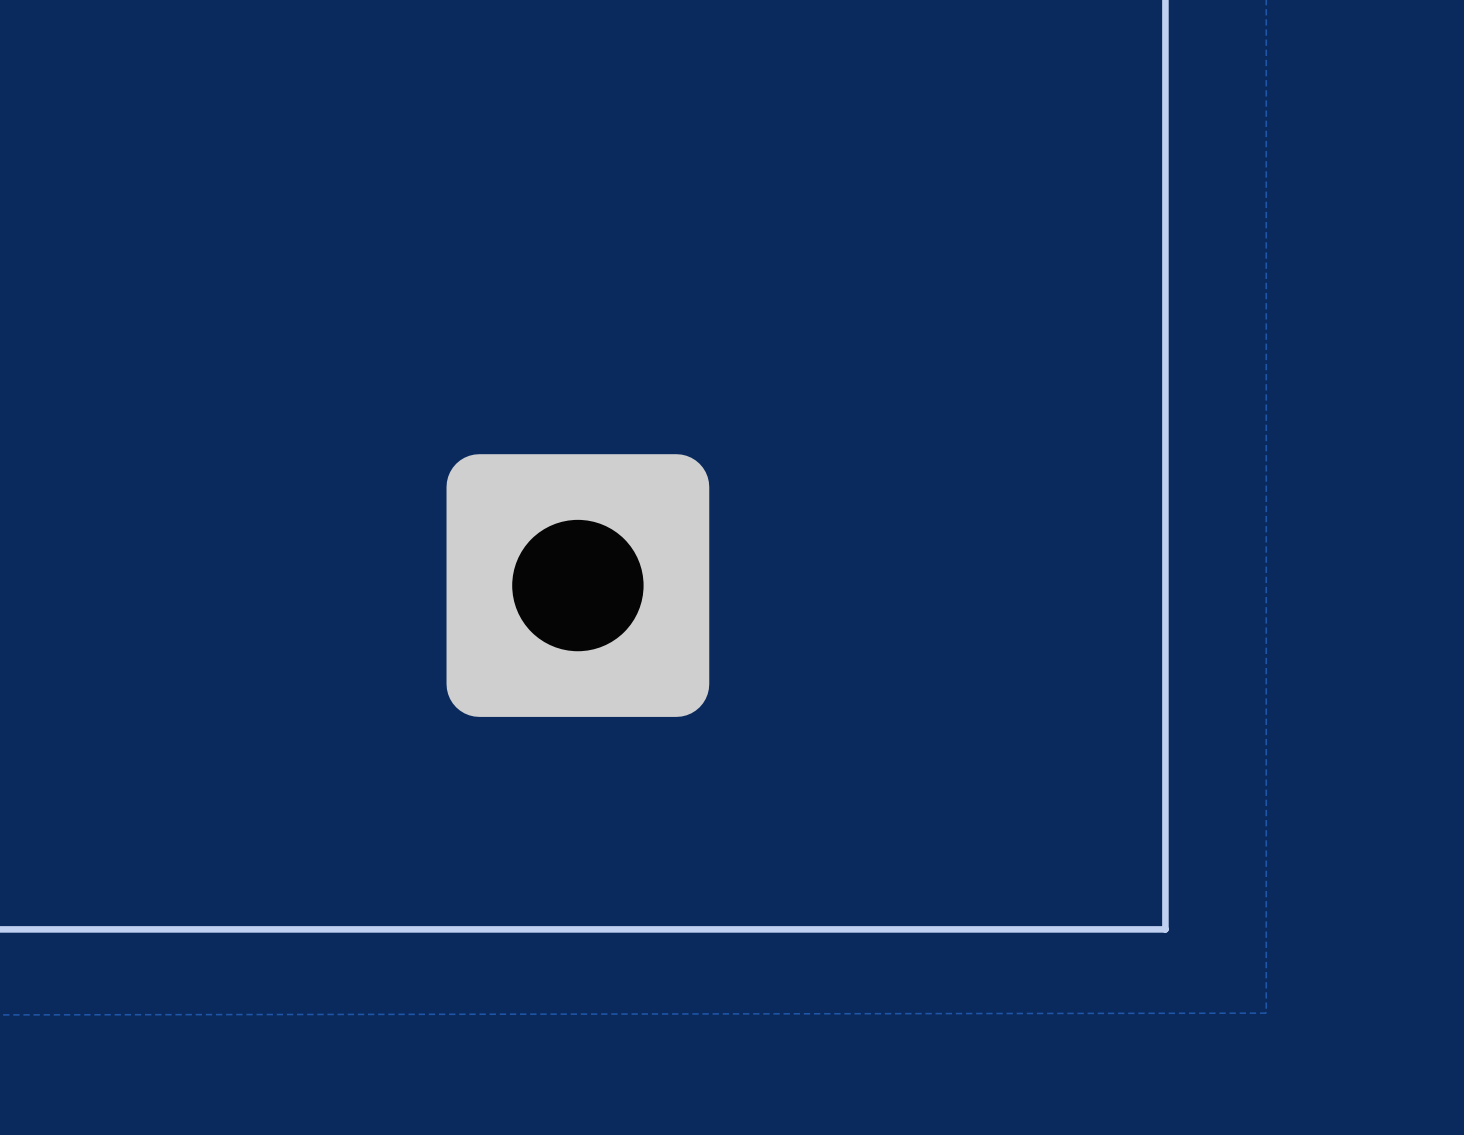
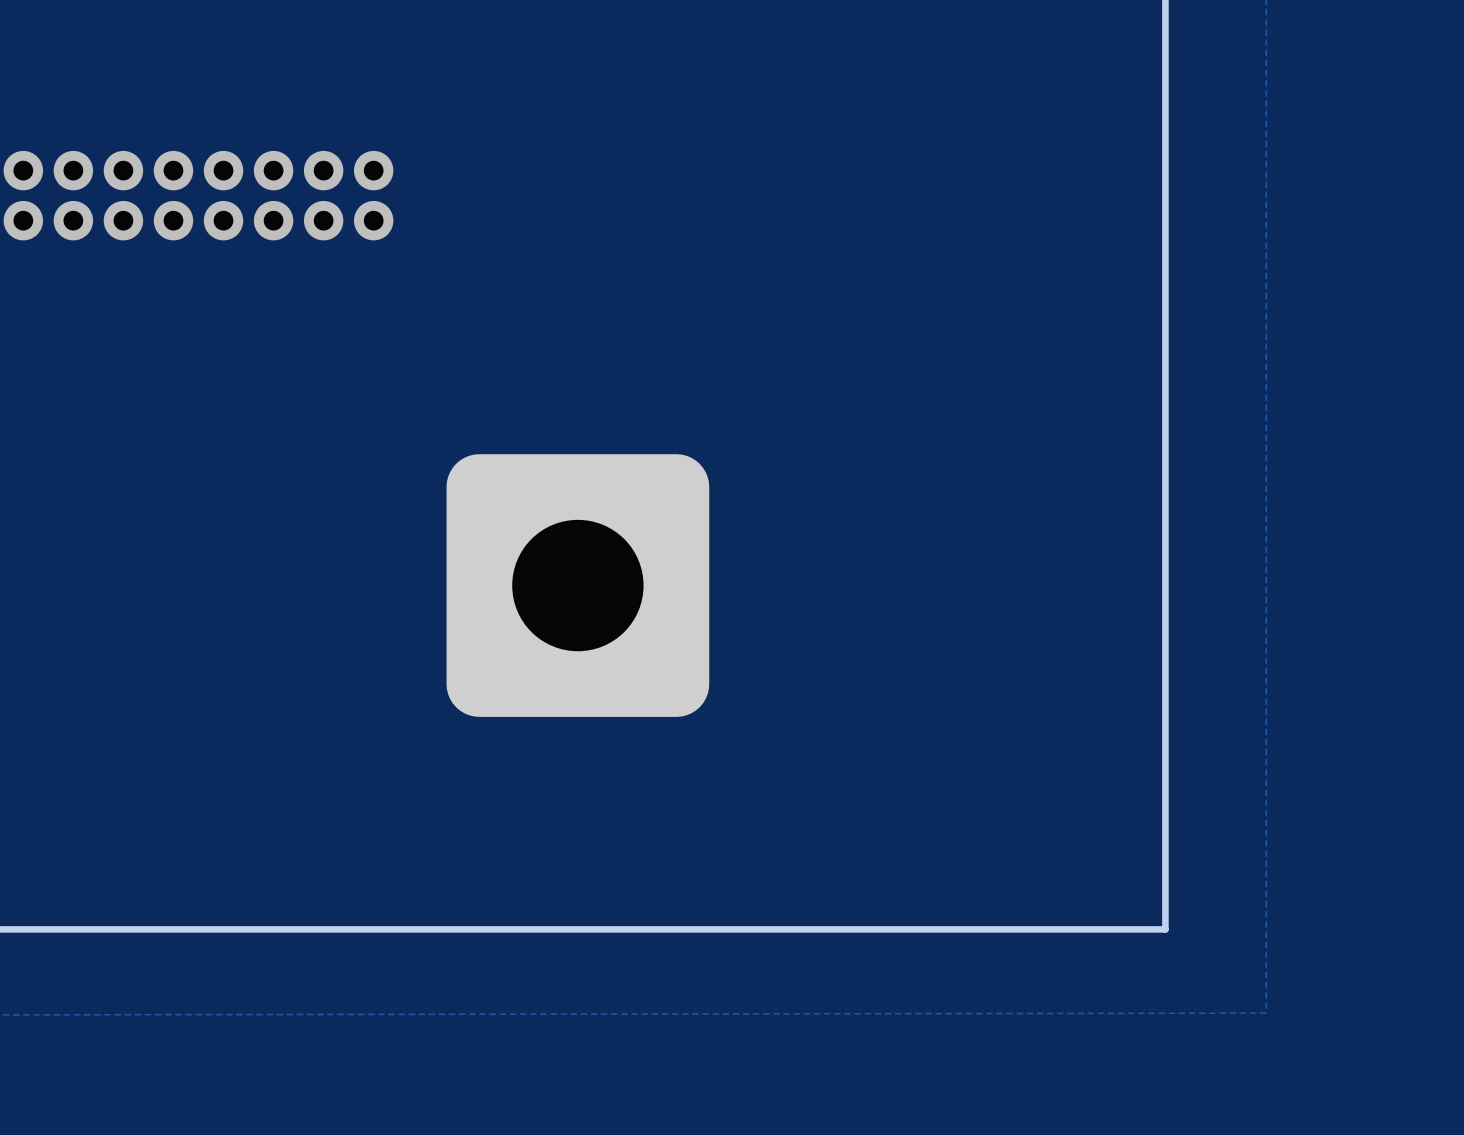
via: none -> (23, 170)
via: none -> (73, 170)
via: none -> (123, 170)
via: none -> (173, 170)
via: none -> (223, 170)
via: none -> (273, 170)
via: none -> (323, 170)
via: none -> (373, 170)
via: none -> (23, 220)
via: none -> (73, 220)
via: none -> (123, 220)
via: none -> (173, 220)
via: none -> (223, 220)
via: none -> (273, 220)
via: none -> (323, 220)
via: none -> (373, 220)

